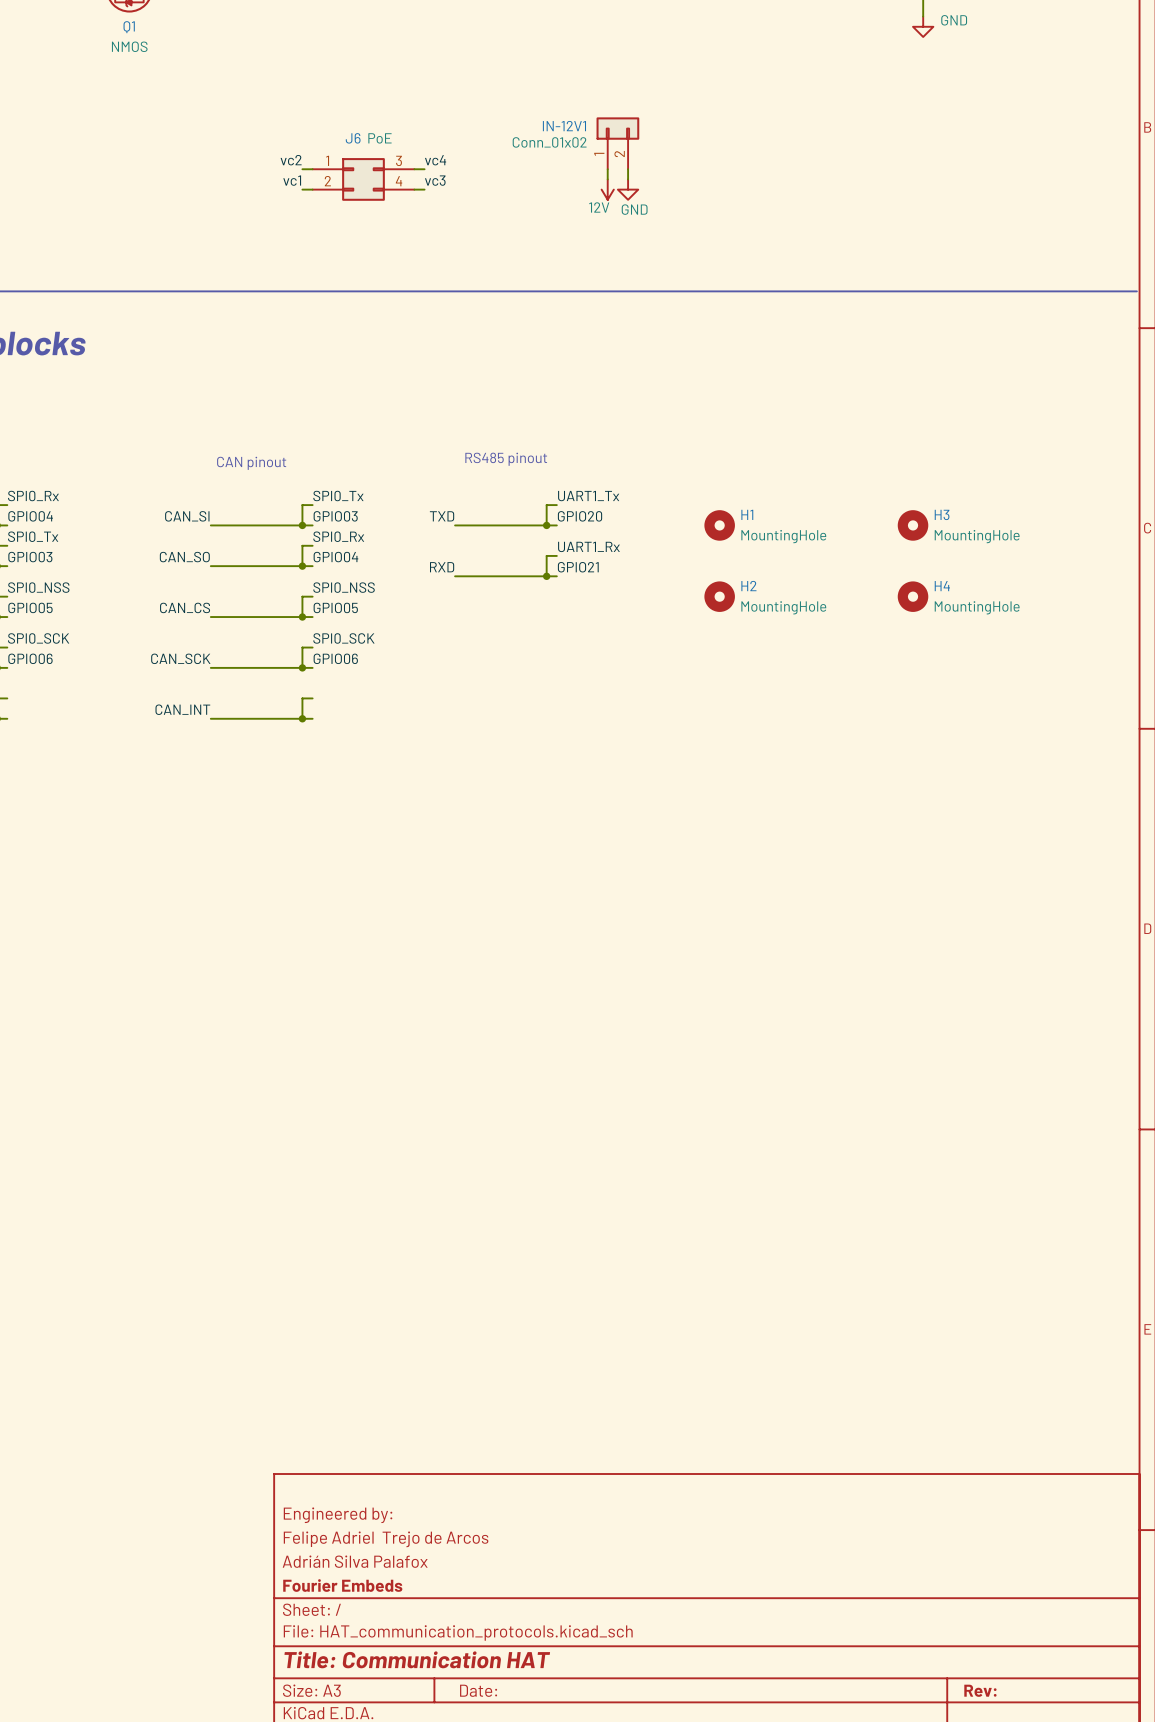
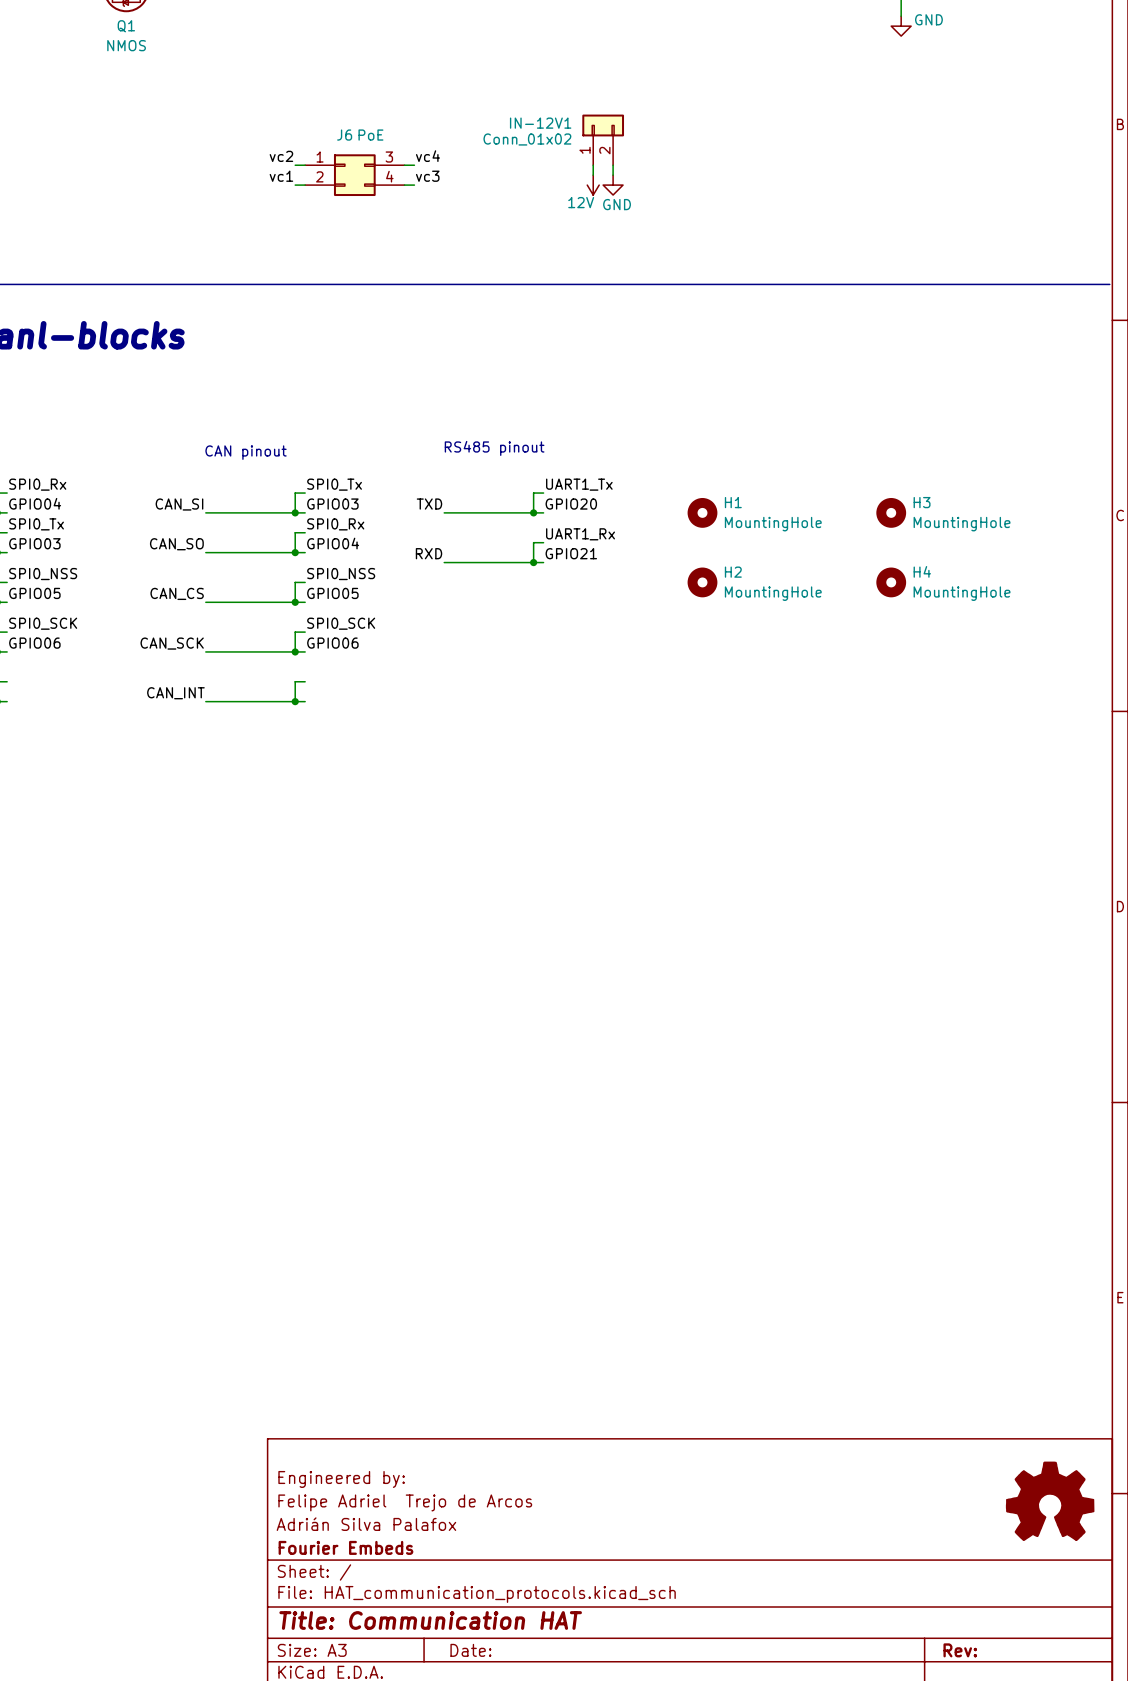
power symbol: none -> (1050, 1501)

